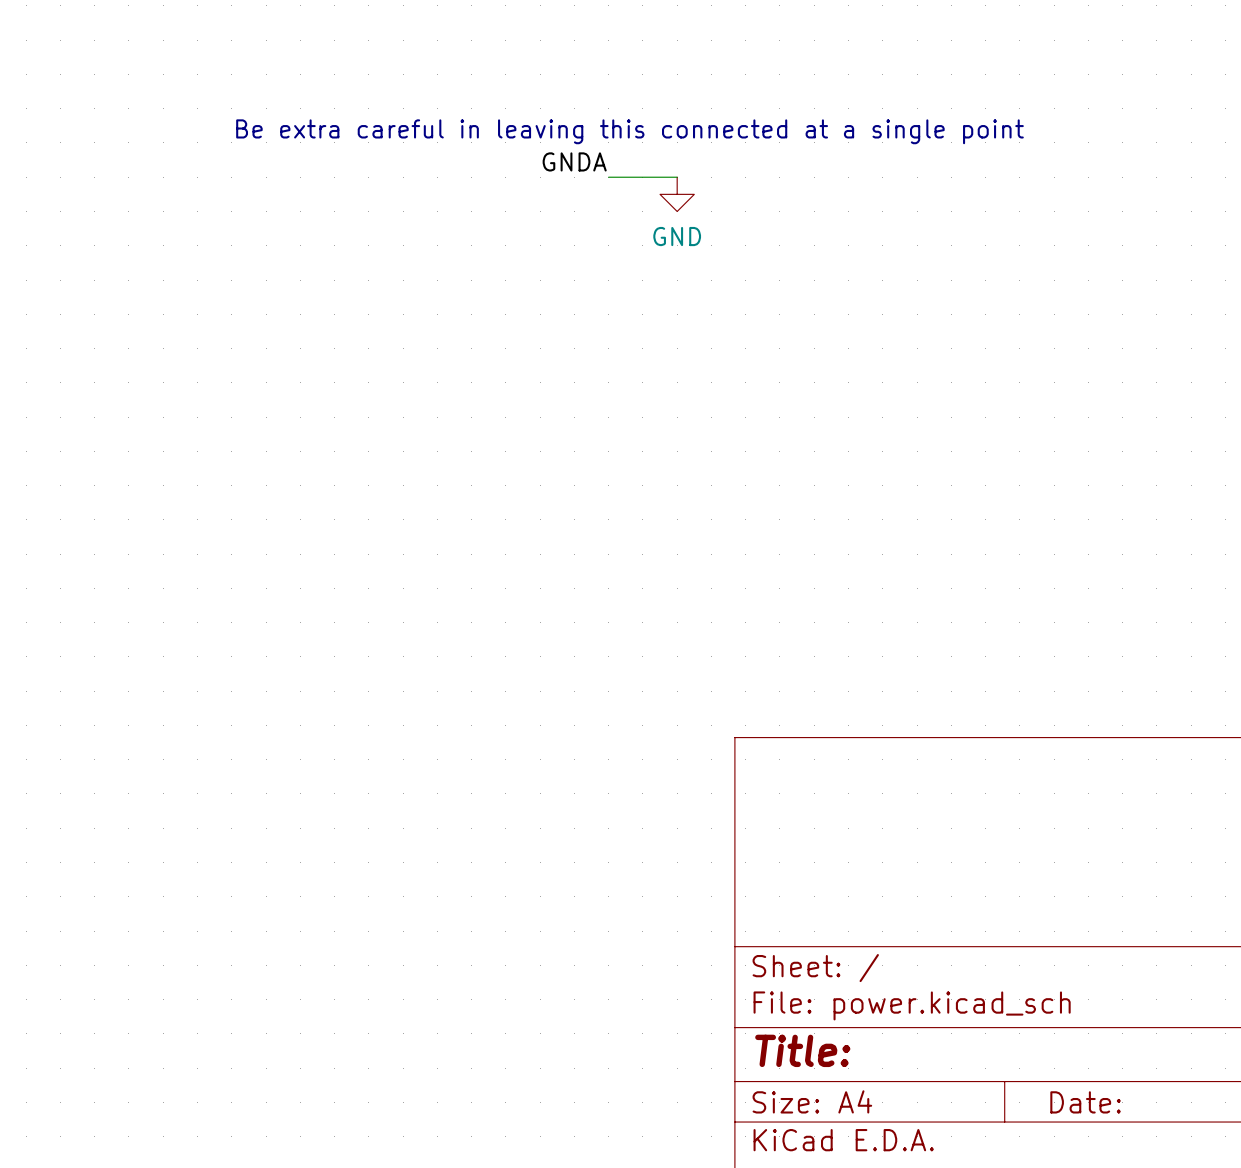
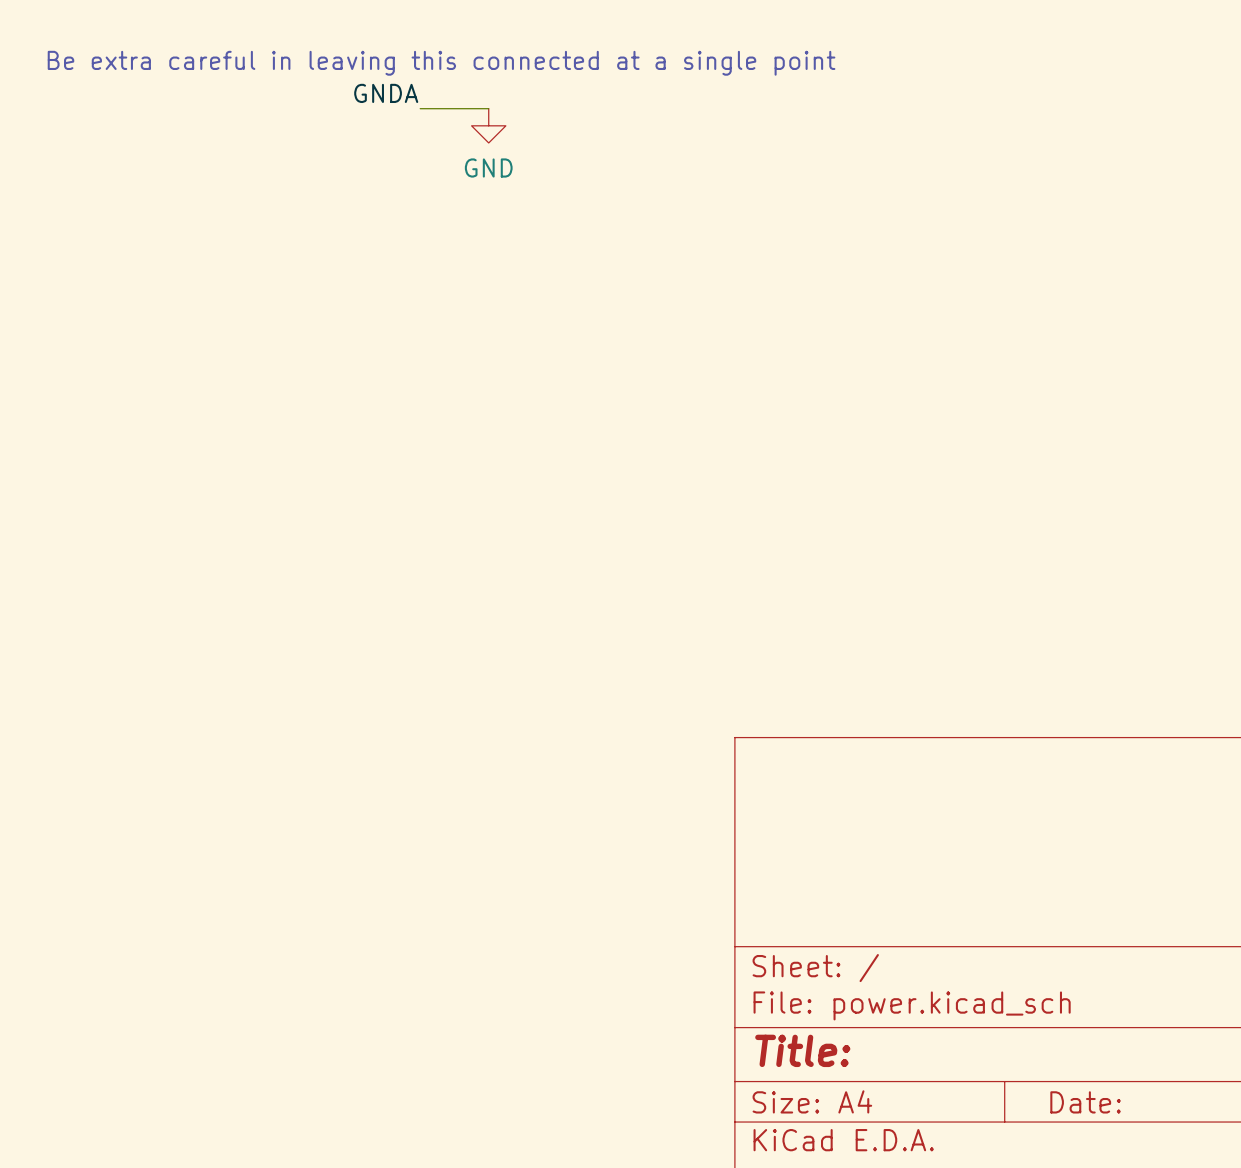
text position: Be extra careful in leaving this connected at a single point (629, 131) -> Be extra careful in leaving this connected at a single point (441, 63)
label position: GNDA (574, 161) -> GNDA (386, 93)
wire: (608, 177) (677, 177) -> (420, 108) (488, 108)
power symbol position: GND (677, 194) -> GND (488, 125)

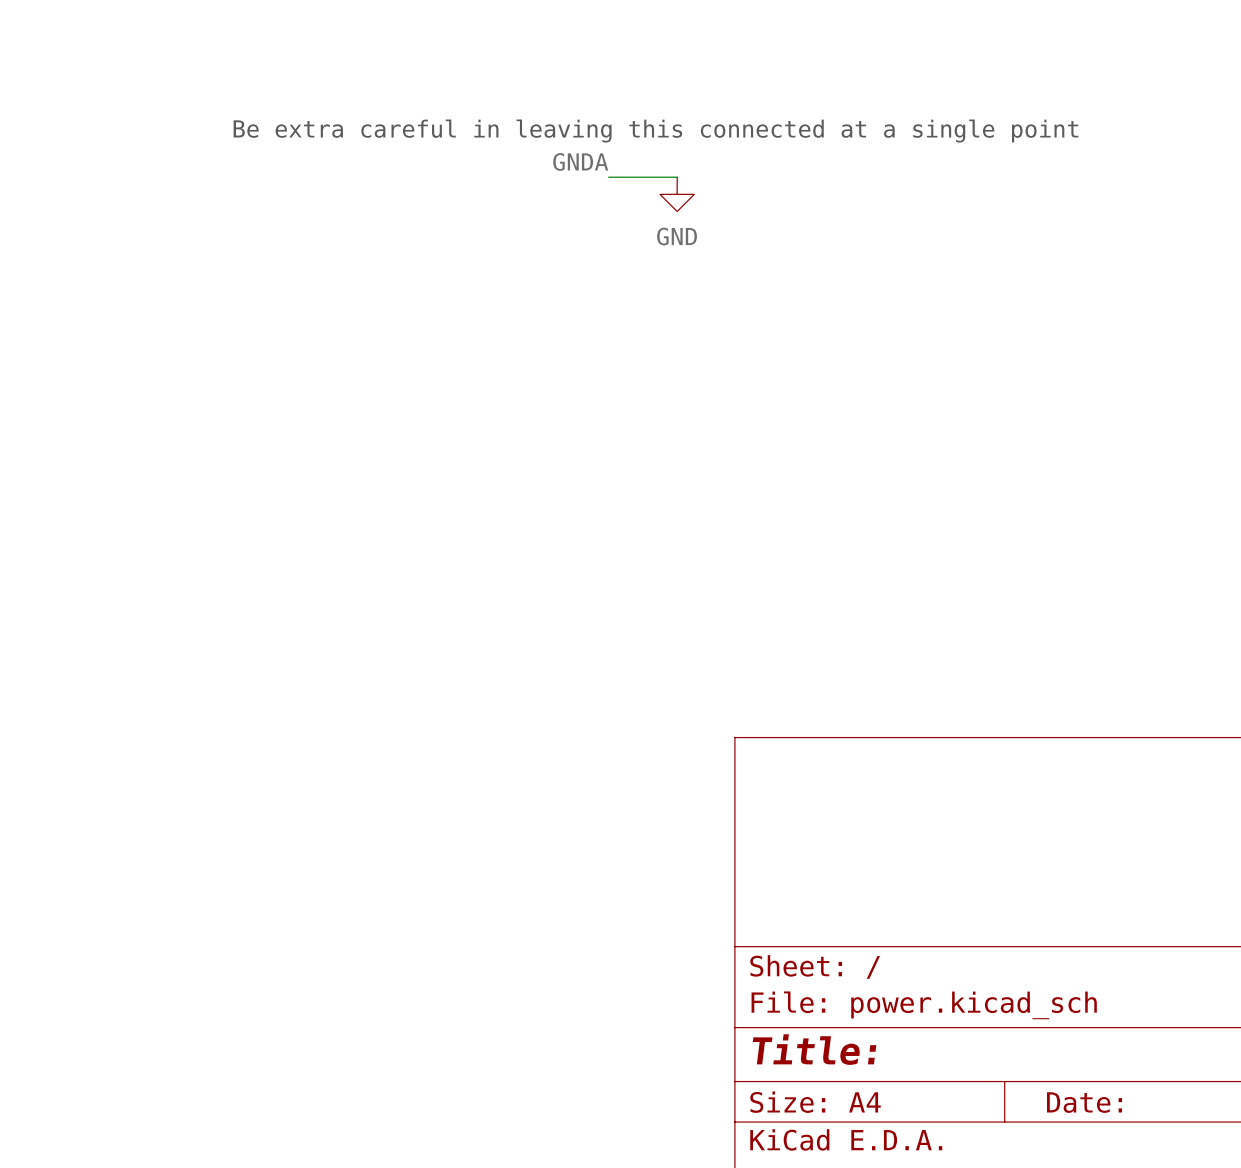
text position: Be extra careful in leaving this connected at a single point (441, 63) -> Be extra careful in leaving this connected at a single point (655, 131)
label position: GNDA (386, 93) -> GNDA (580, 161)
wire: (420, 108) (488, 108) -> (608, 177) (677, 177)
power symbol position: GND (488, 125) -> GND (677, 194)

